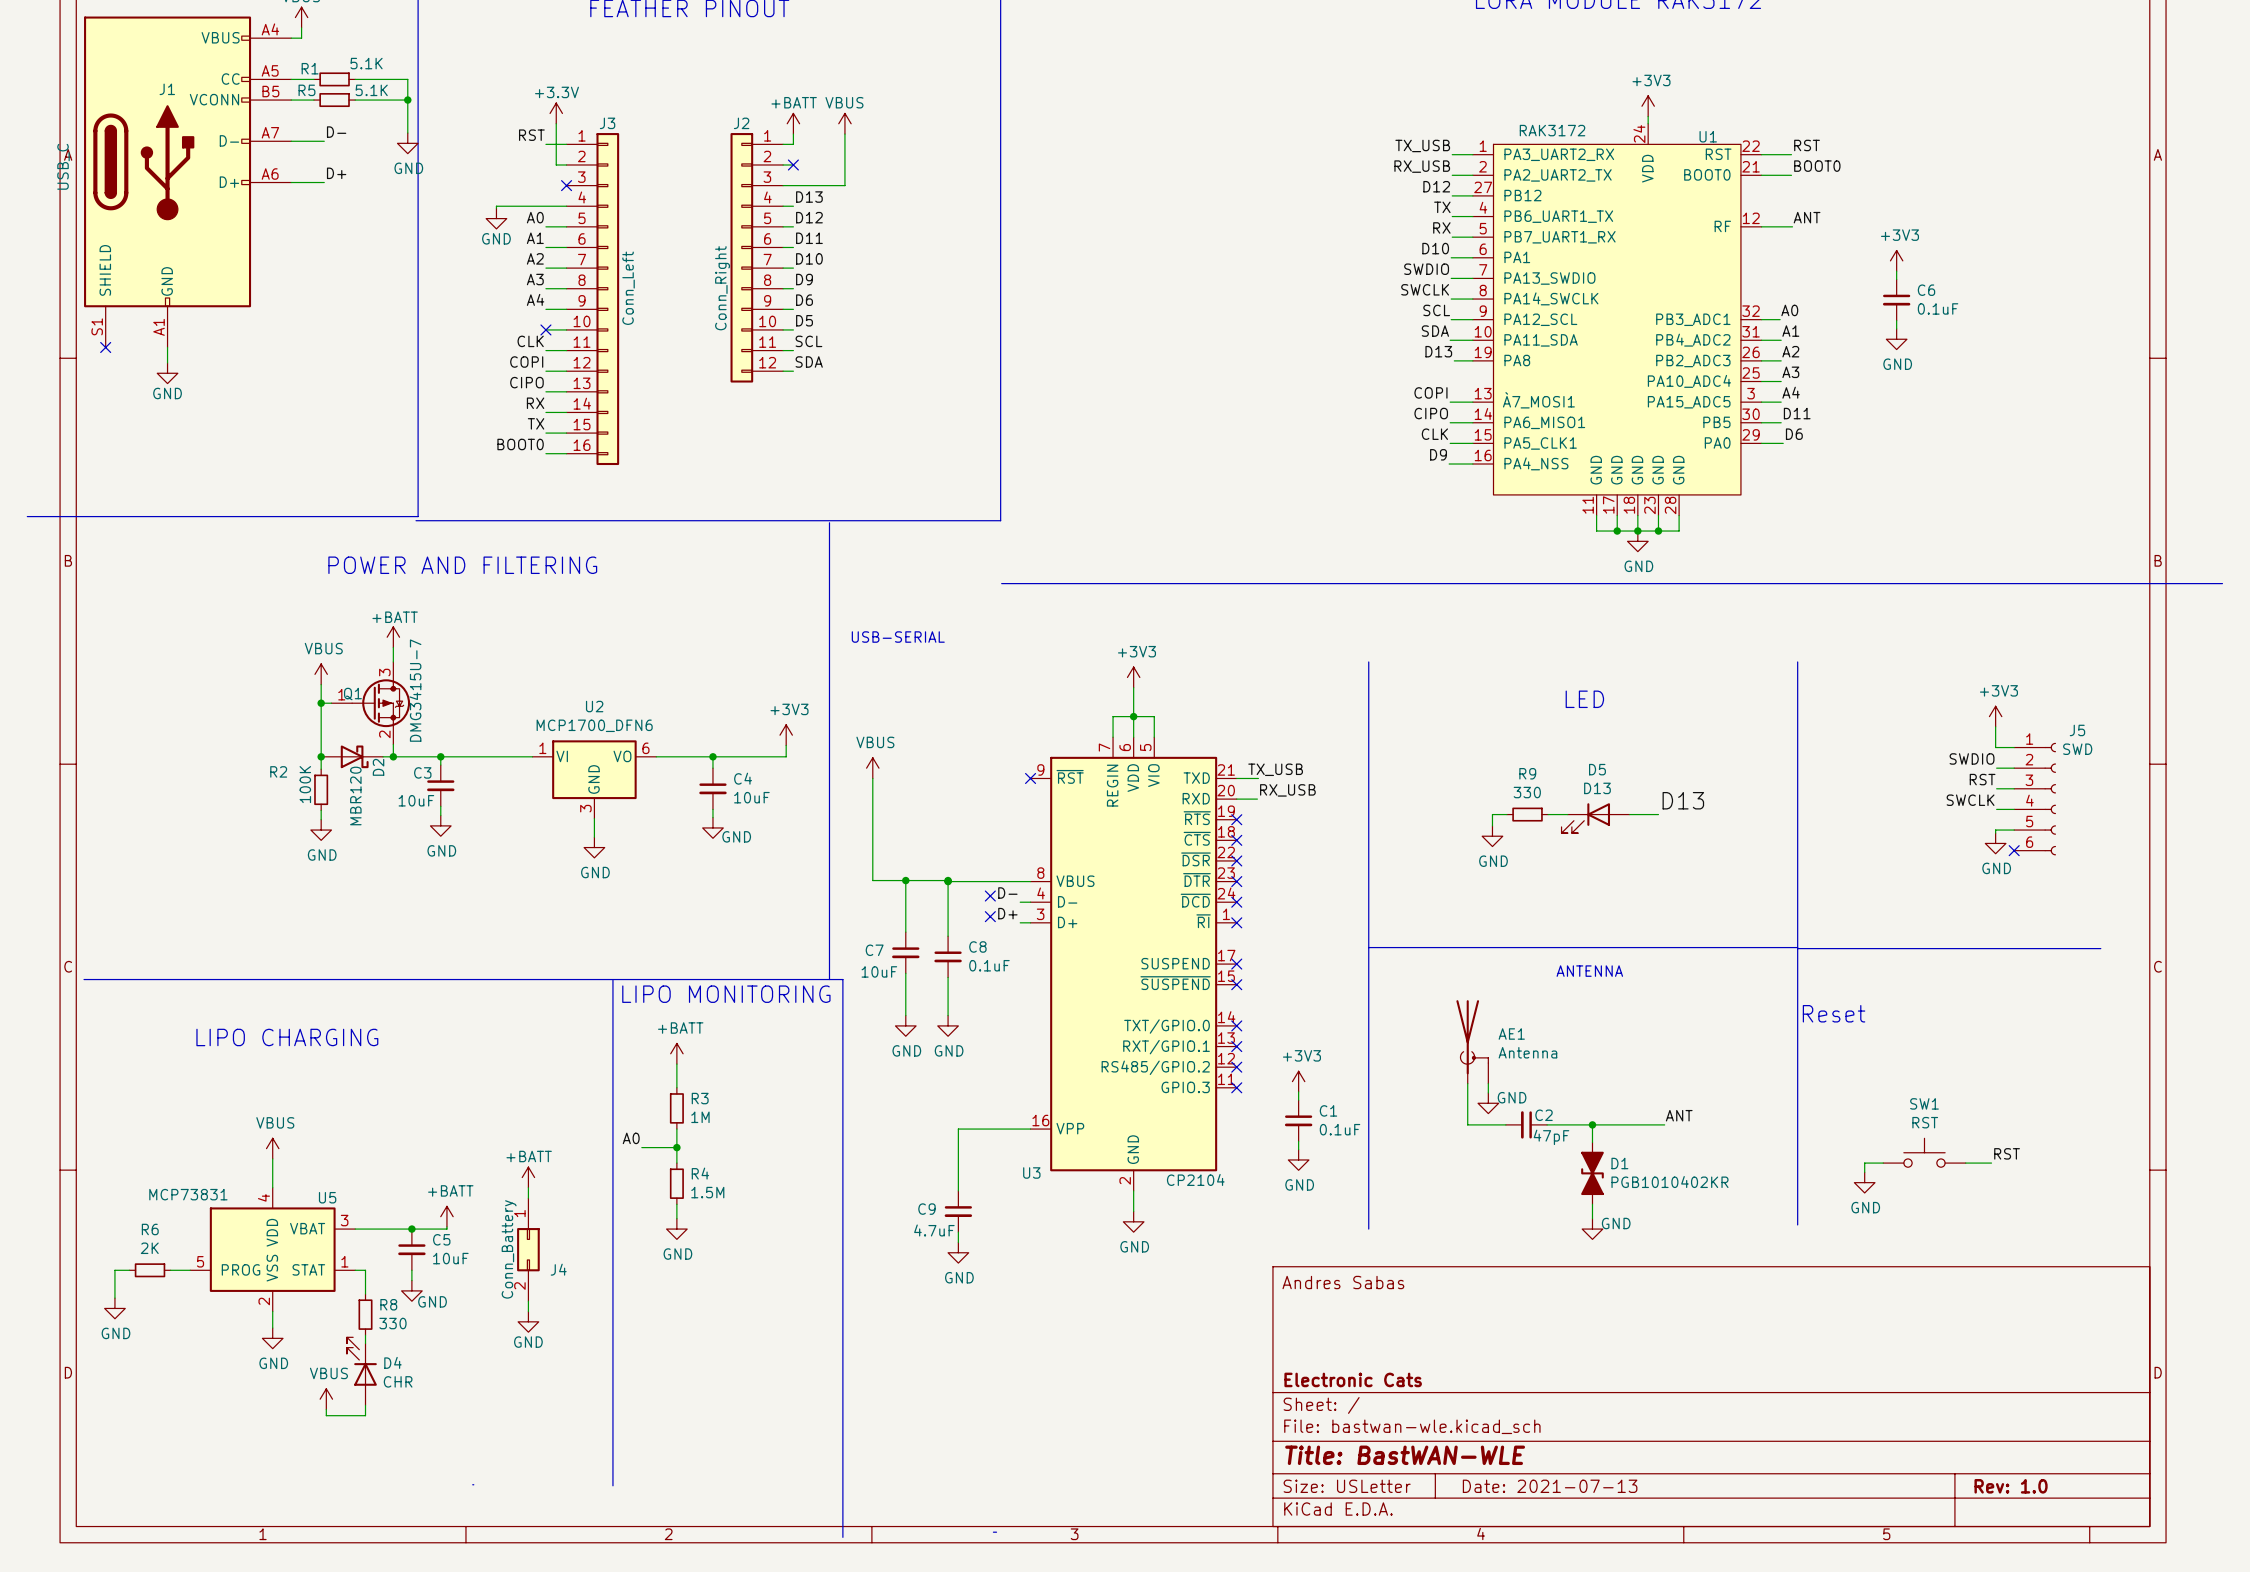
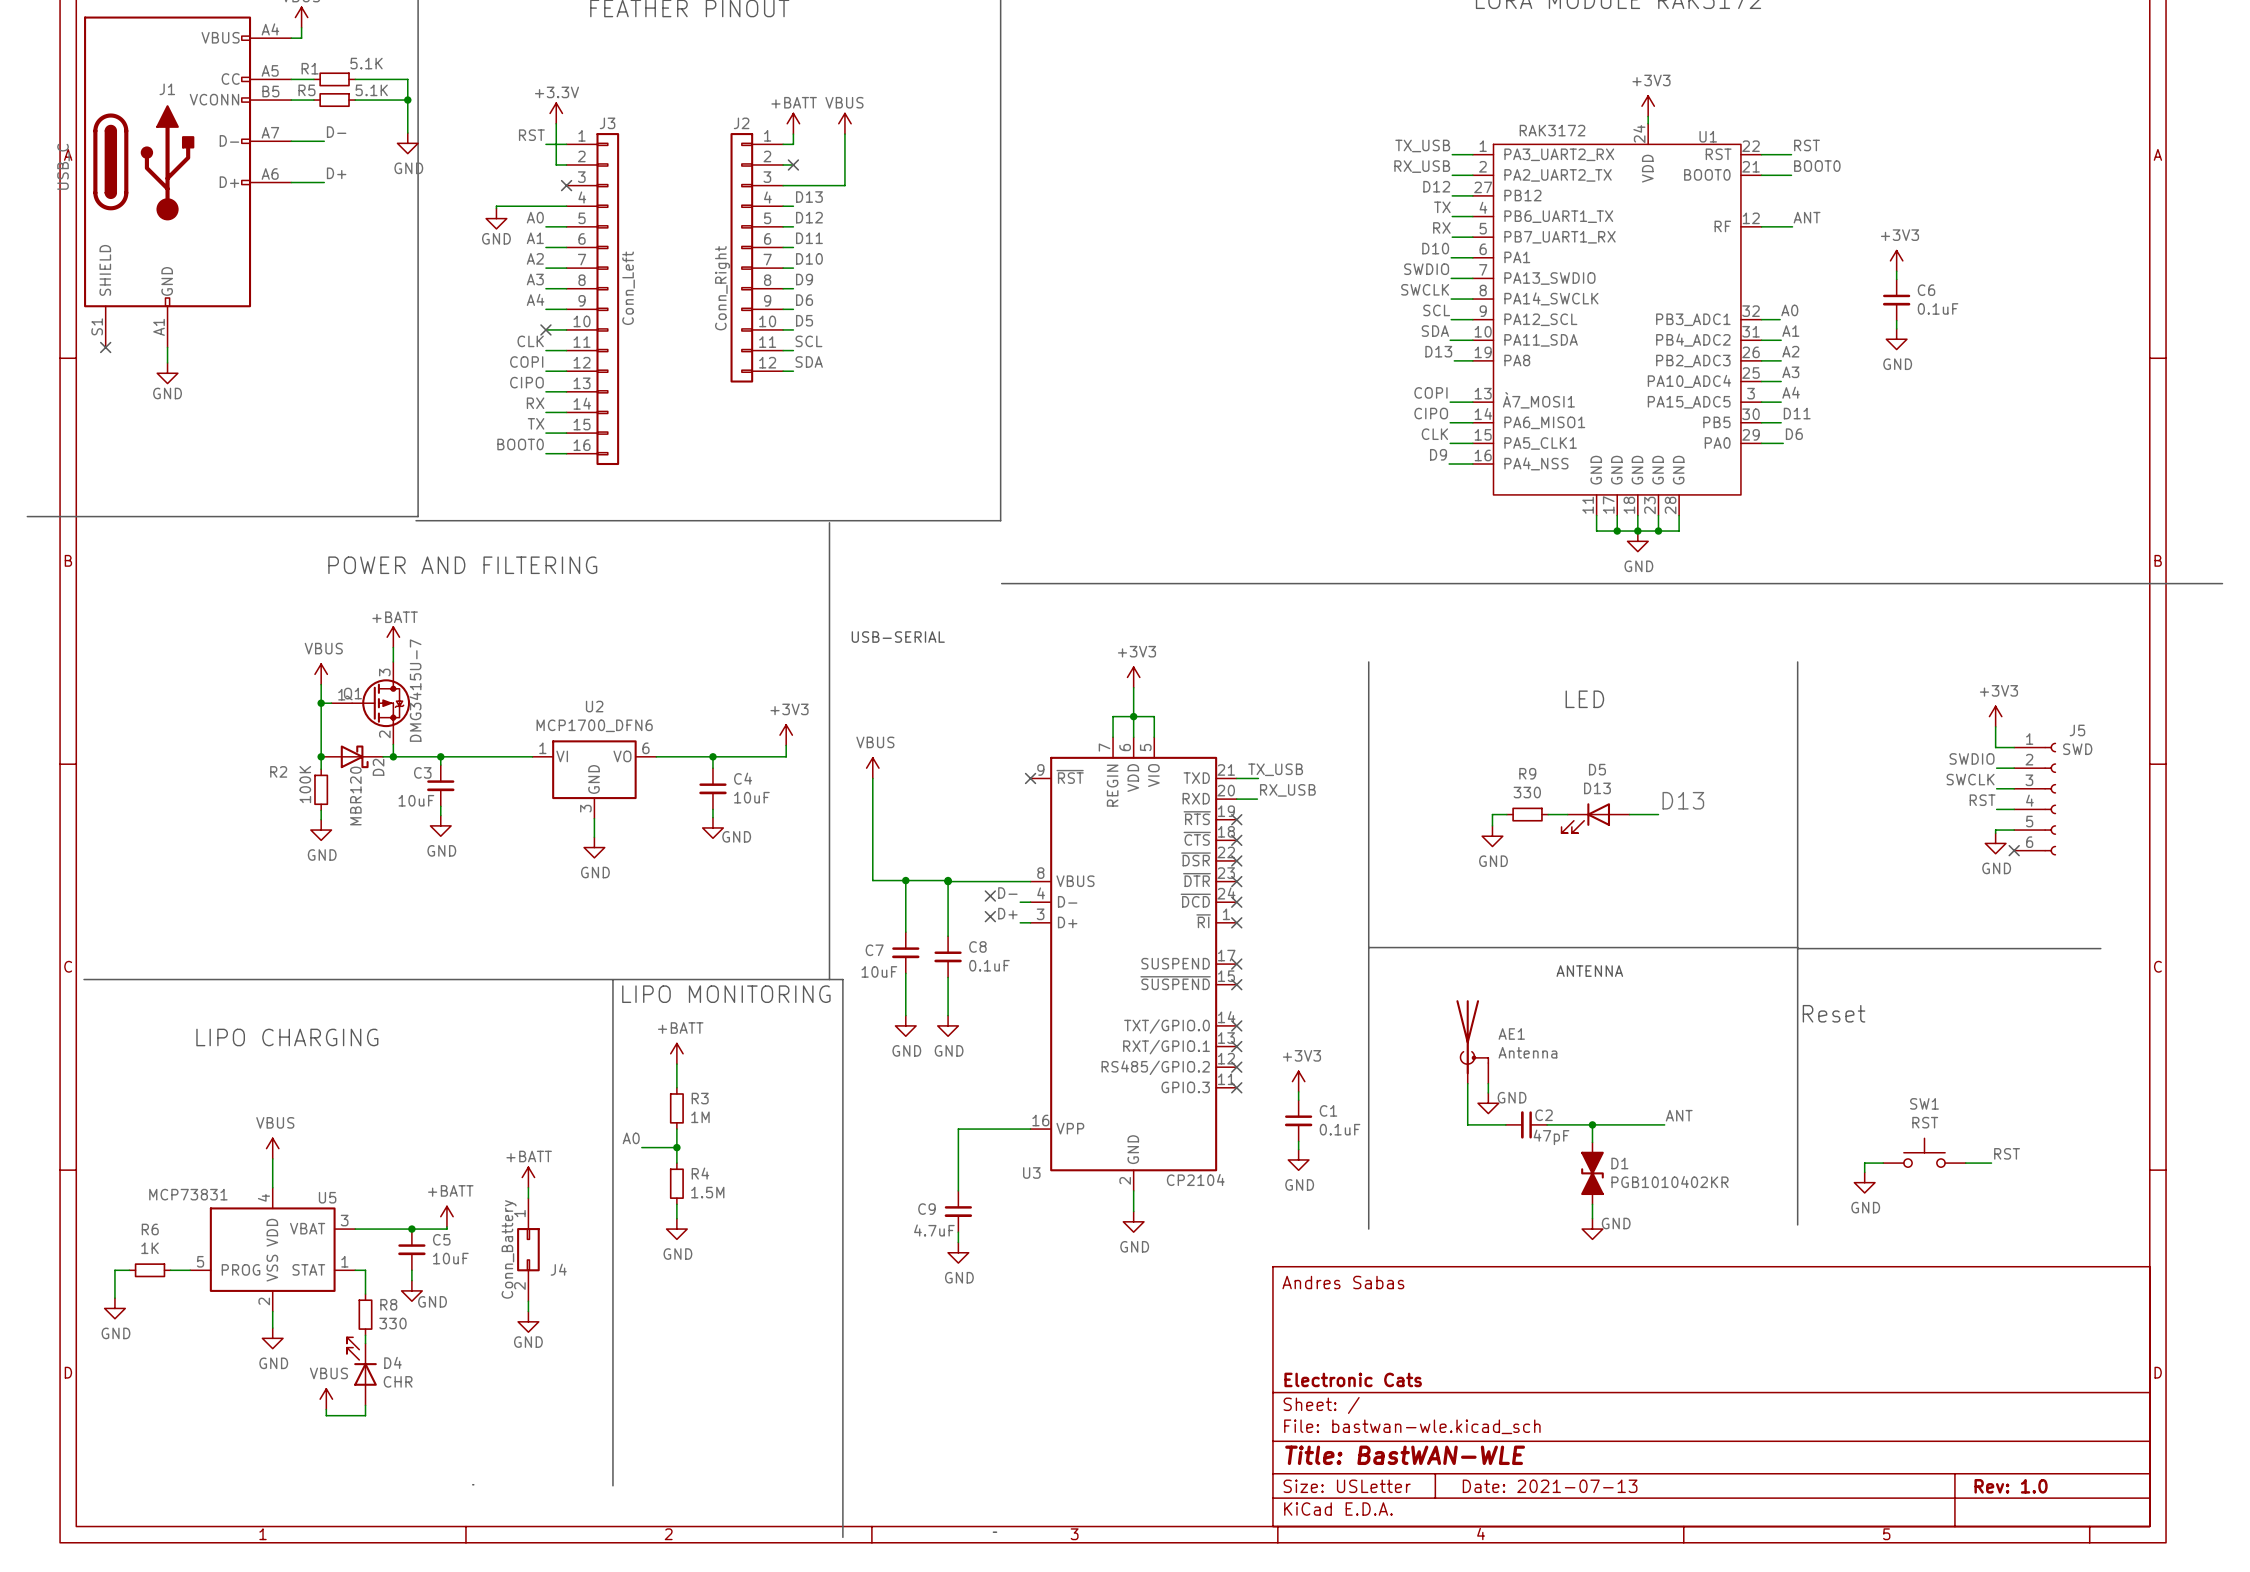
label: RST (1982, 779) -> SWCLK (1970, 779)
label: SWCLK (1970, 800) -> RST (1982, 800)
R6 value: 2K (149, 1248) -> 1K (150, 1248)

